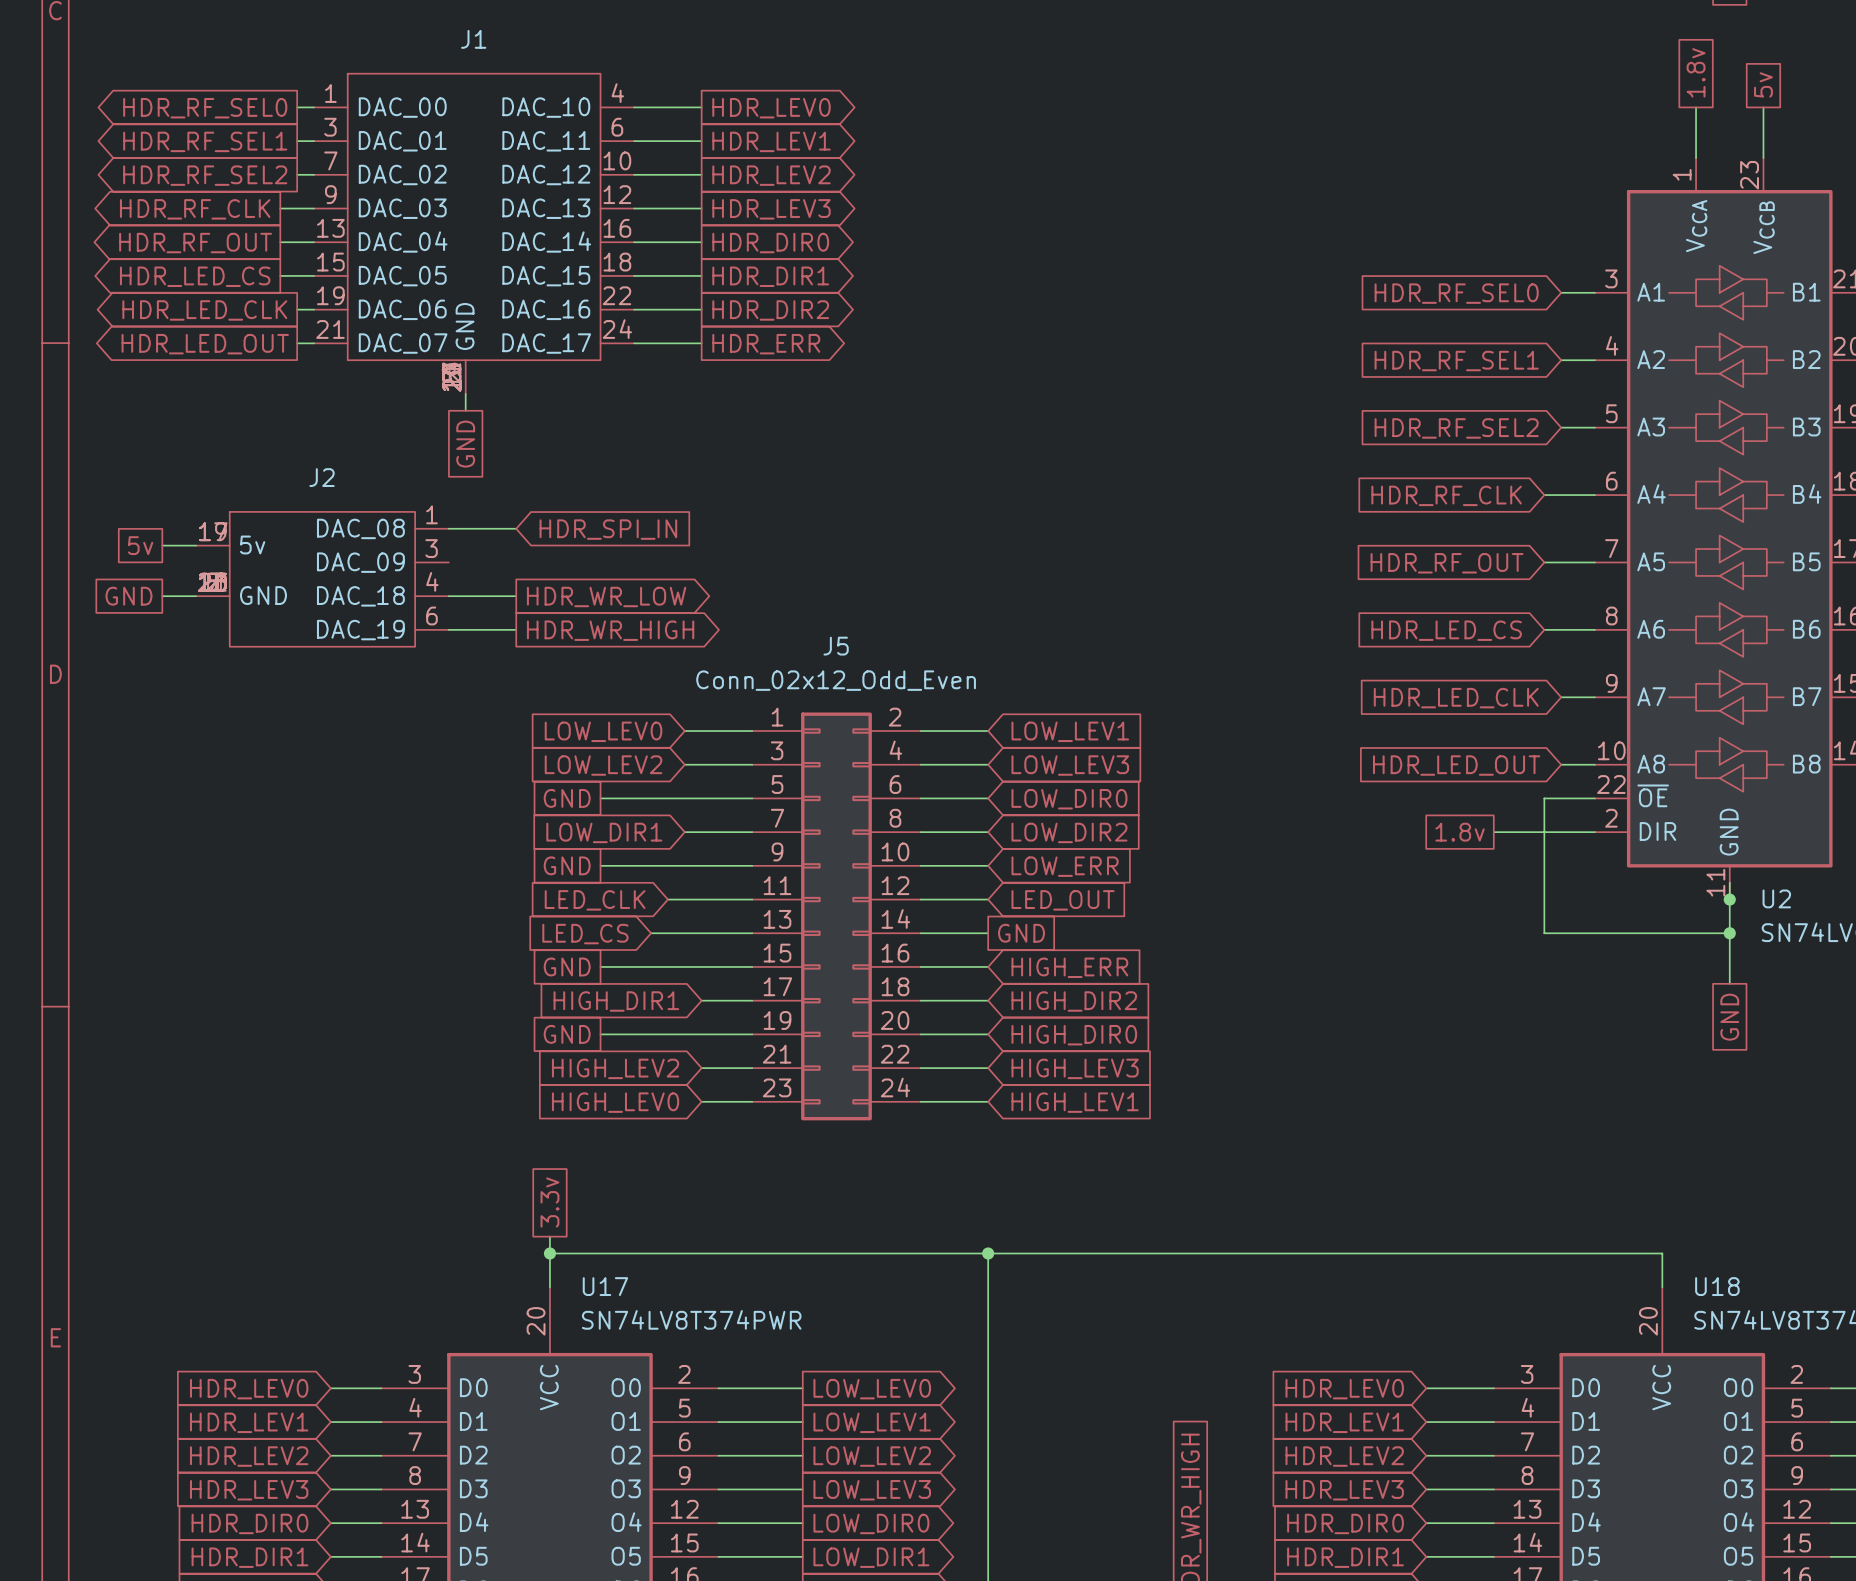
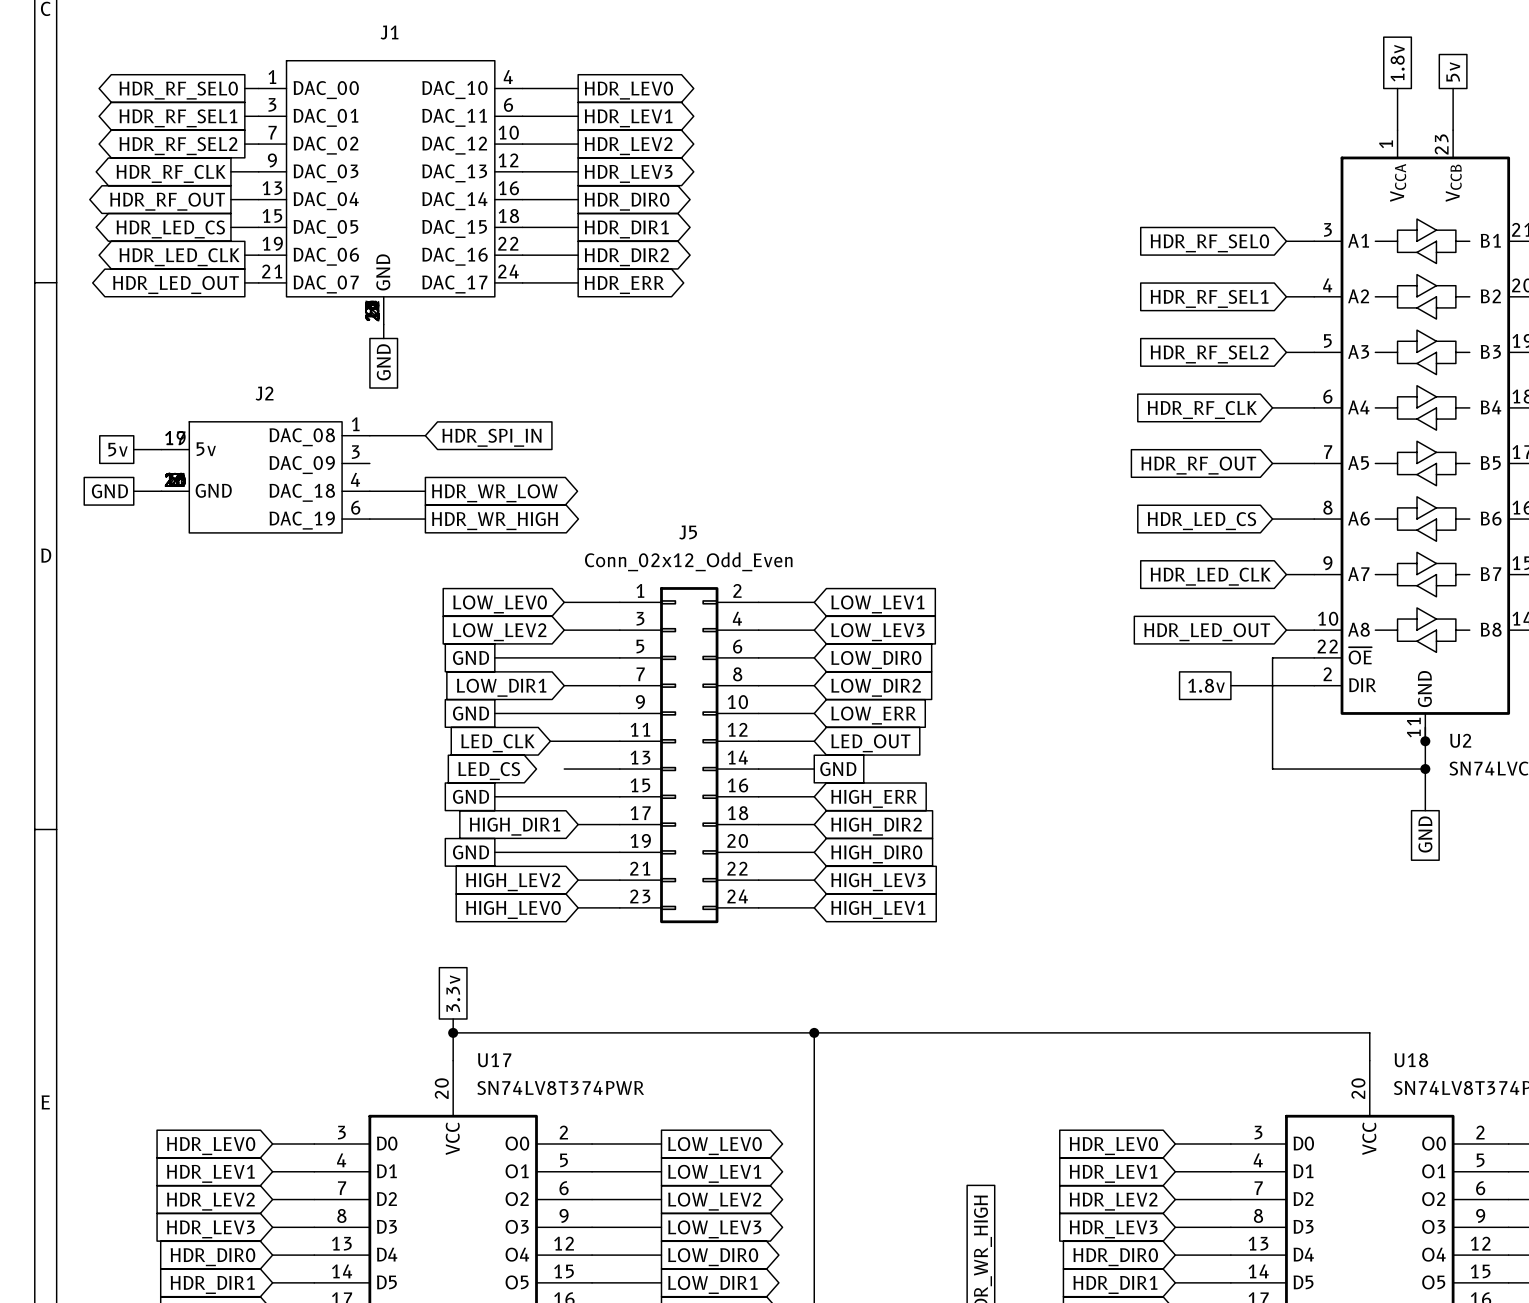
wire: (651, 933) (684, 933) -> none

